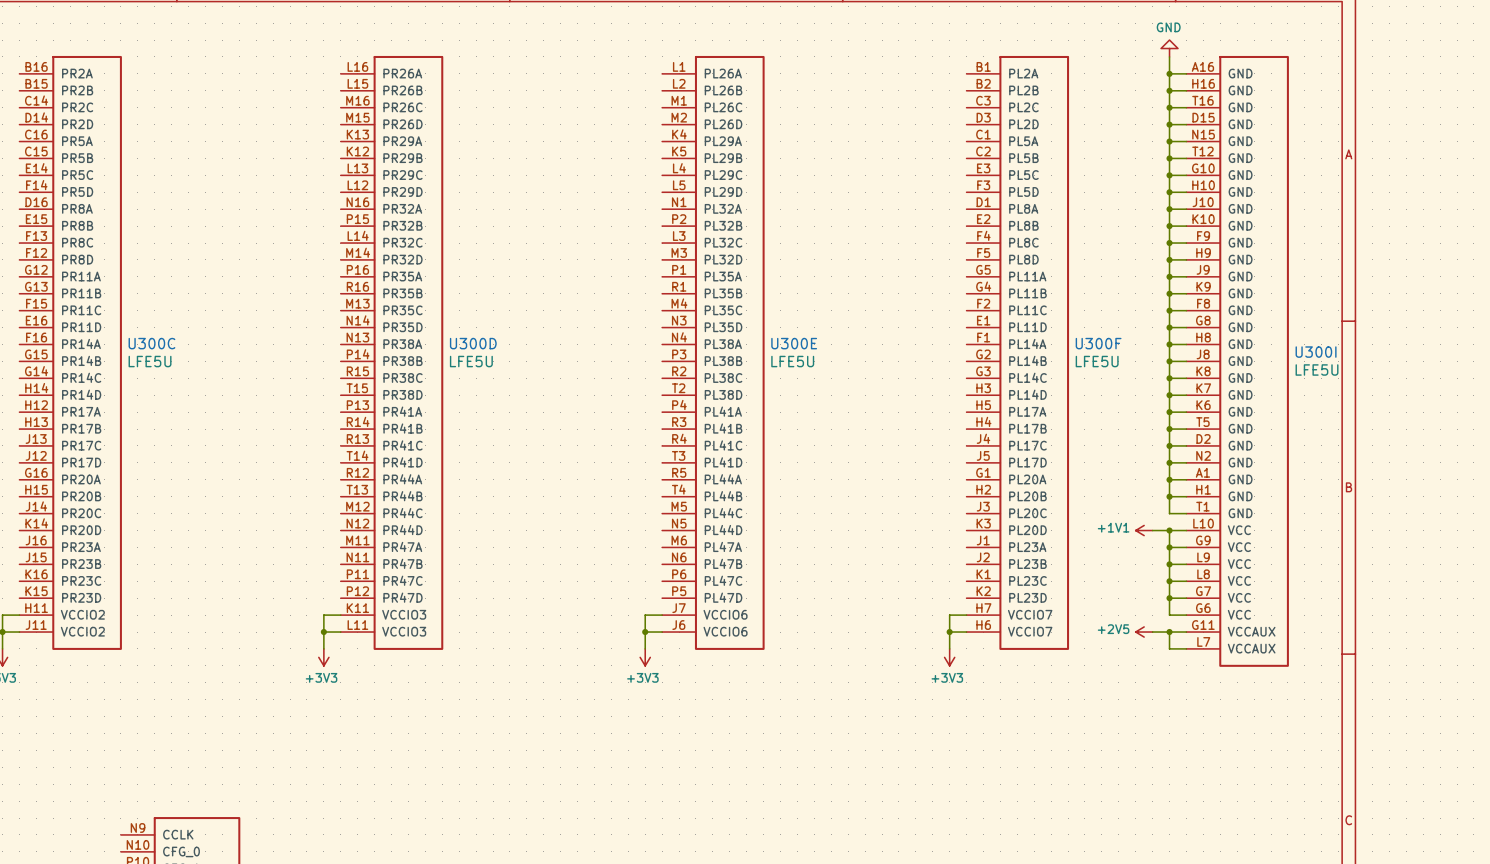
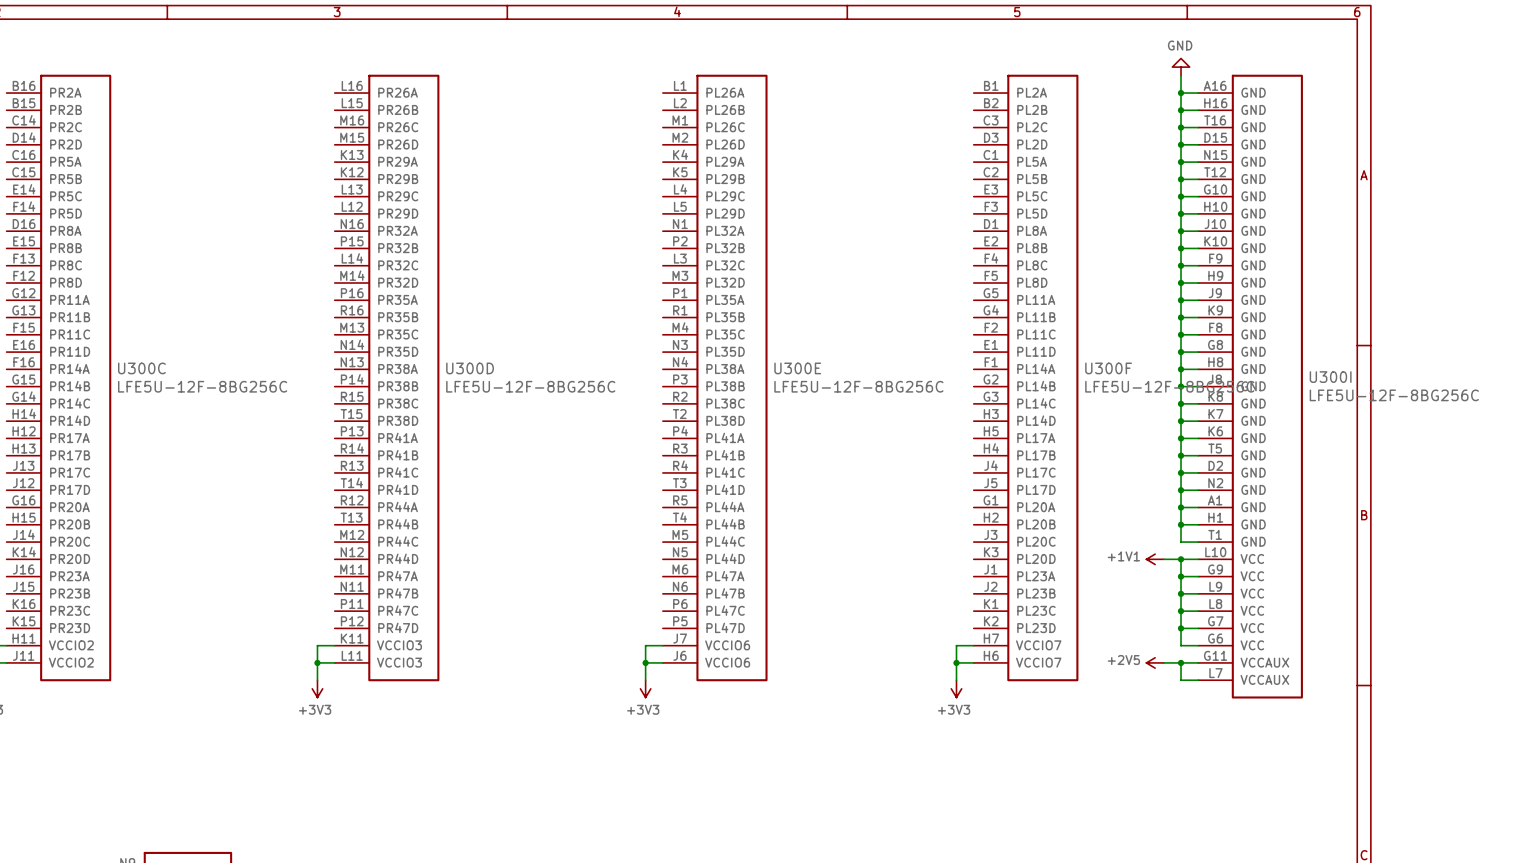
U300C value: LFE5U (150, 361) -> LFE5U-12F-8BG256C (202, 386)
U300D value: LFE5U (471, 361) -> LFE5U-12F-8BG256C (530, 386)
U300E value: LFE5U (792, 361) -> LFE5U-12F-8BG256C (858, 386)
U300F value: LFE5U (1097, 361) -> LFE5U-12F-8BG256C (1169, 386)
U300I value: LFE5U (1317, 369) -> LFE5U-12F-8BG256C (1394, 395)

